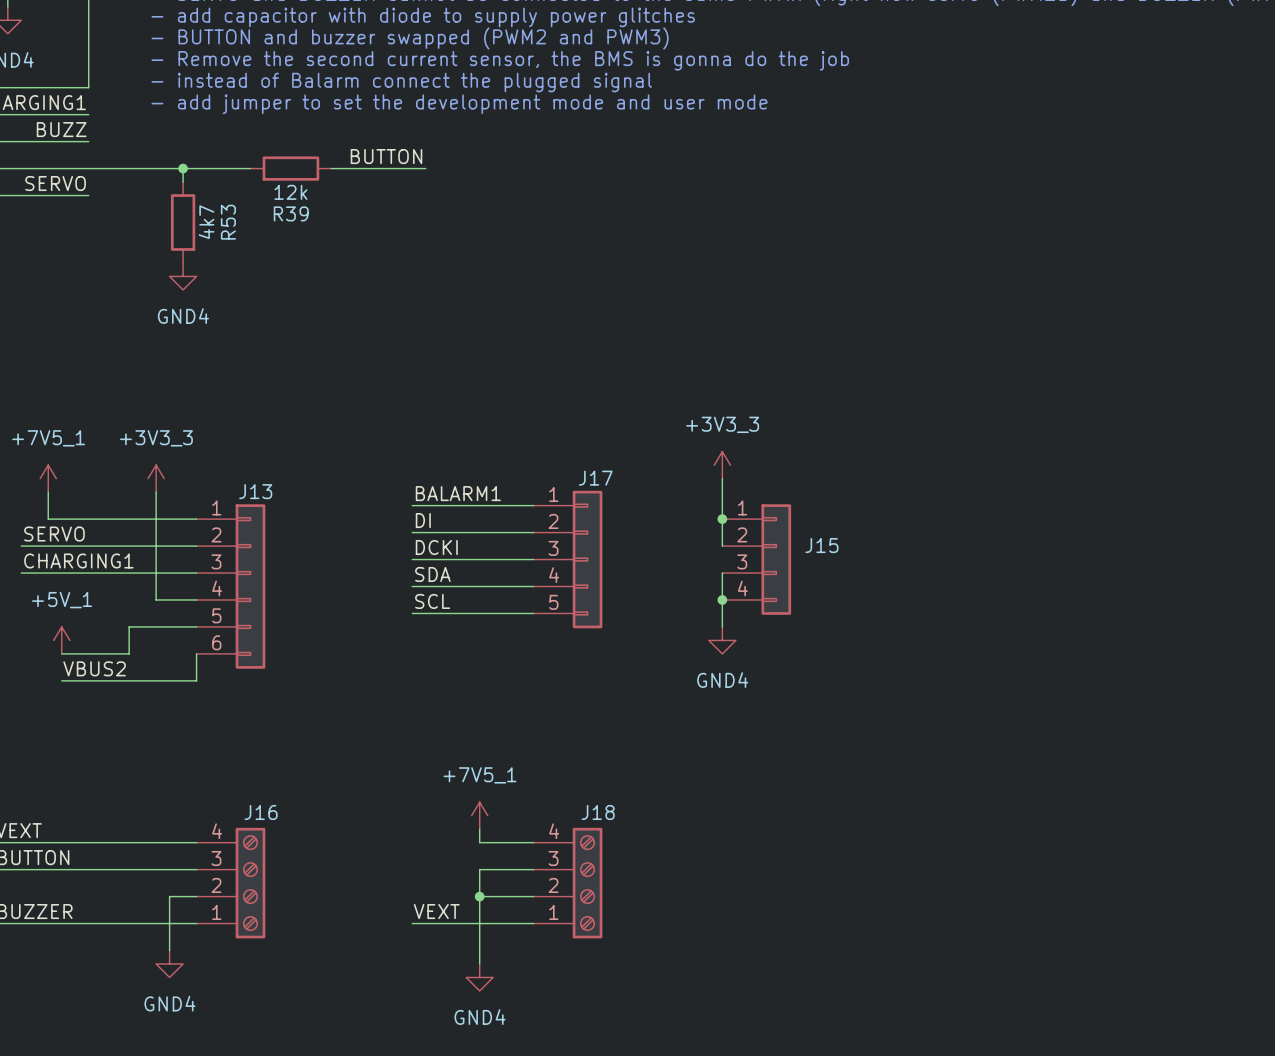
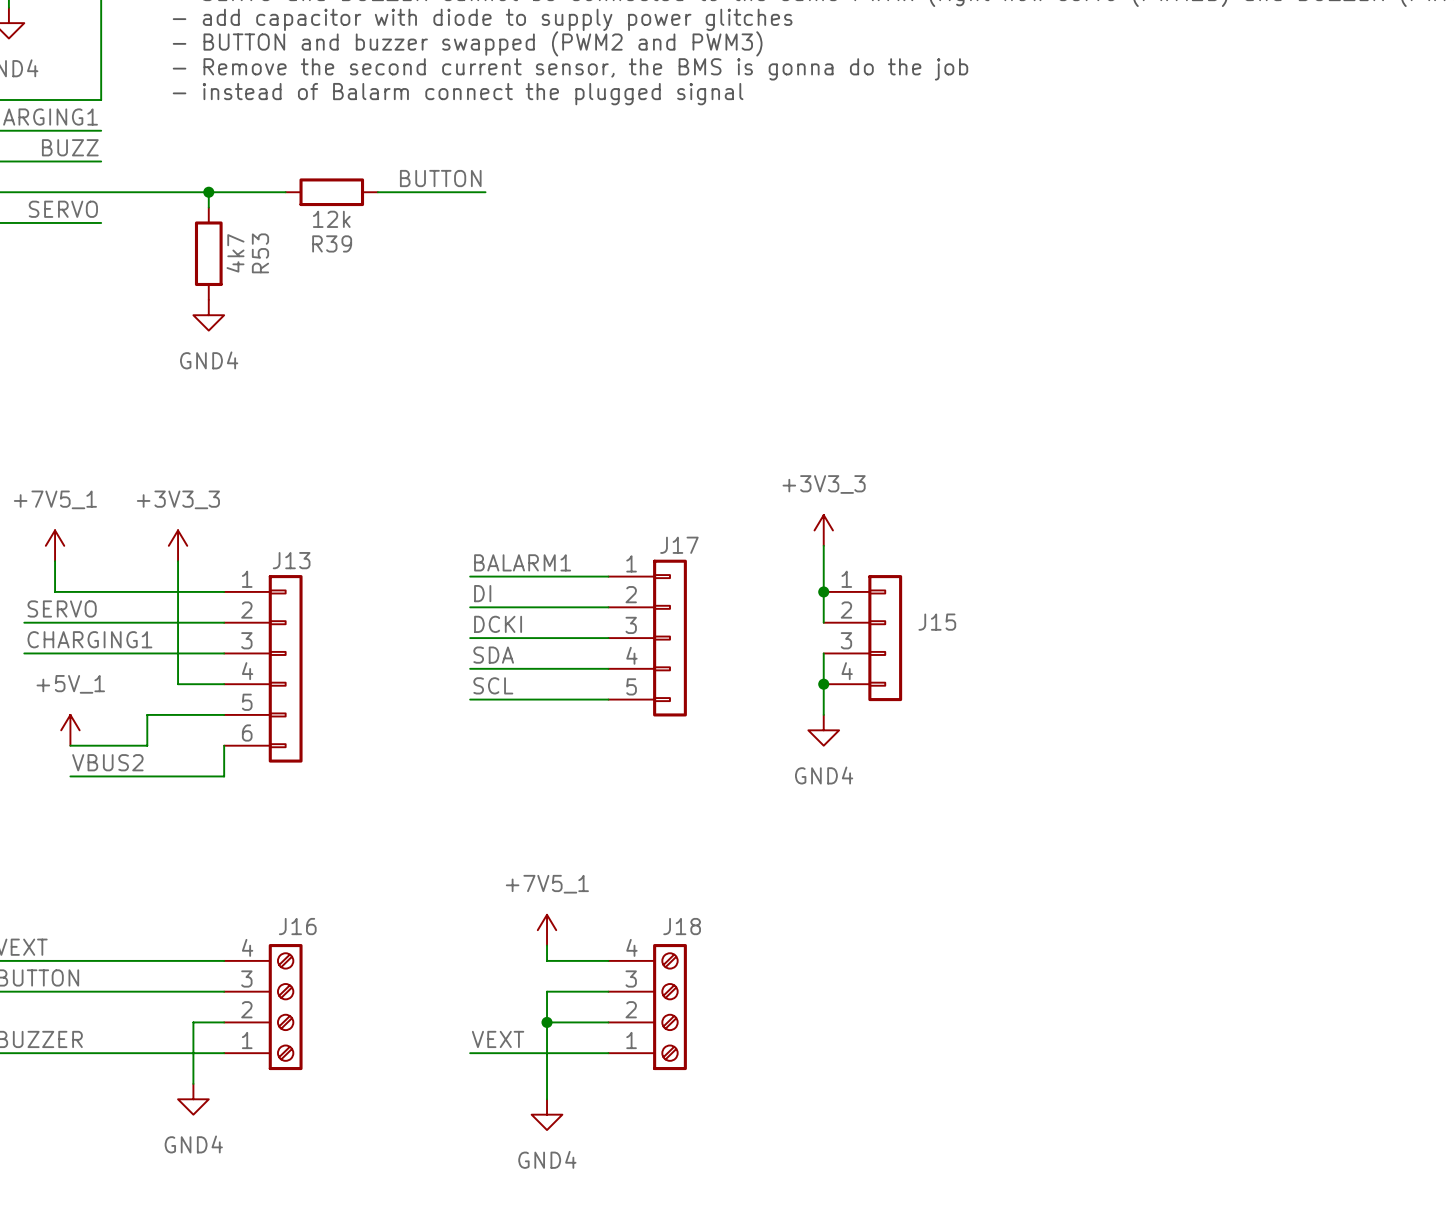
text: - add jumper to set the development mode and user mode (459, 104) -> none

